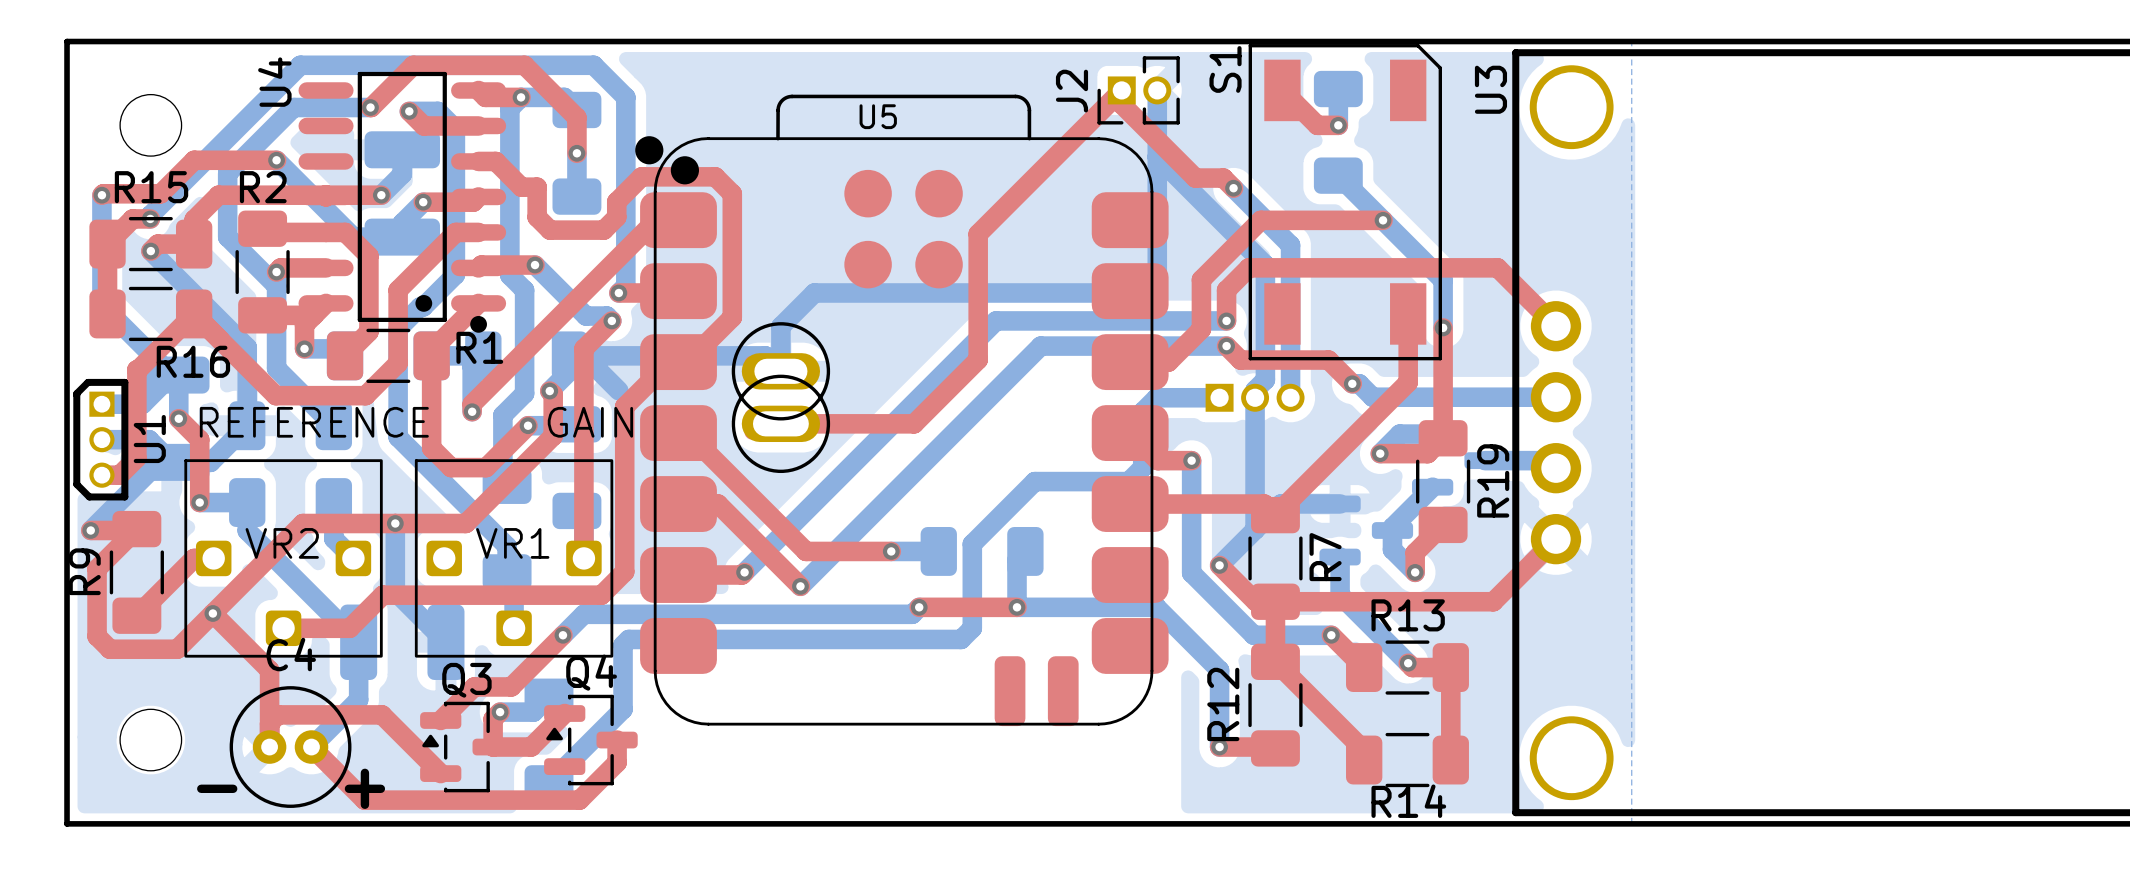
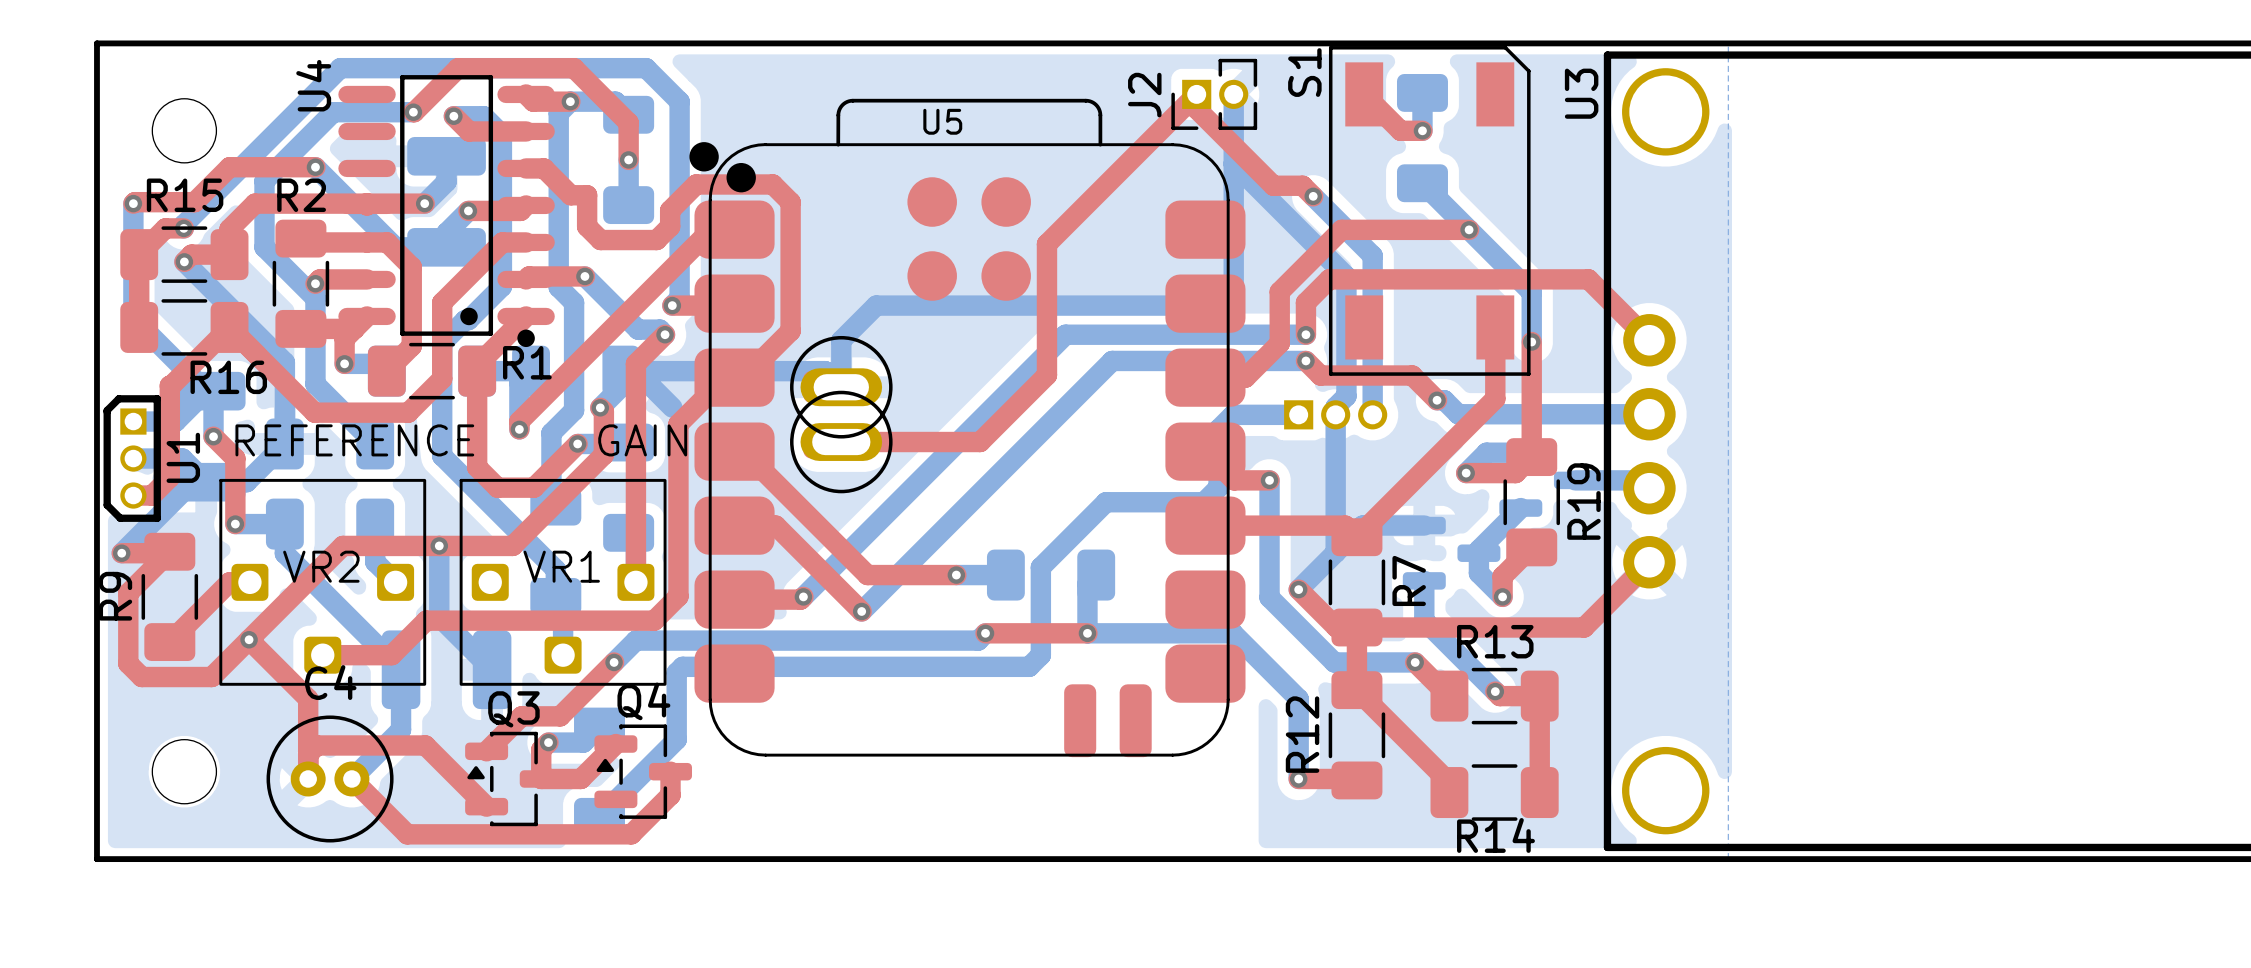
text: - + (291, 788) -> none

